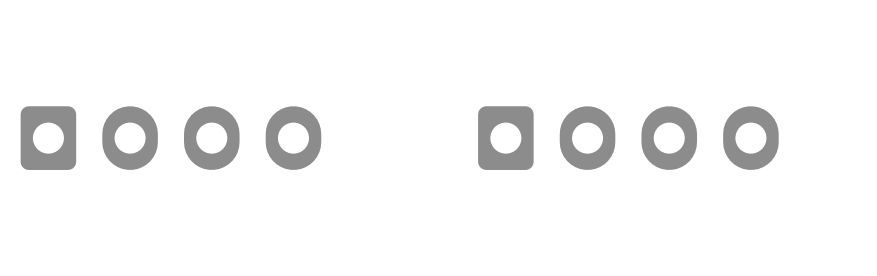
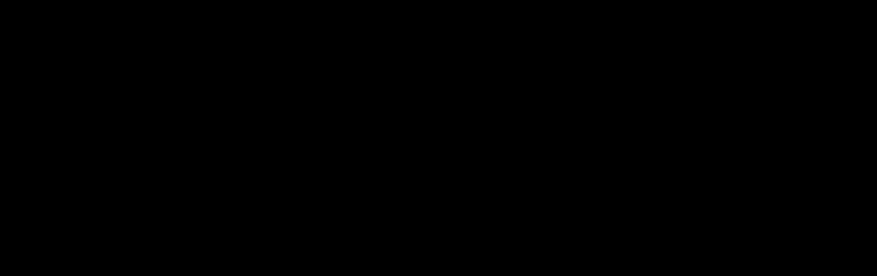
part: (170, 138) -> none
part: (628, 138) -> none

